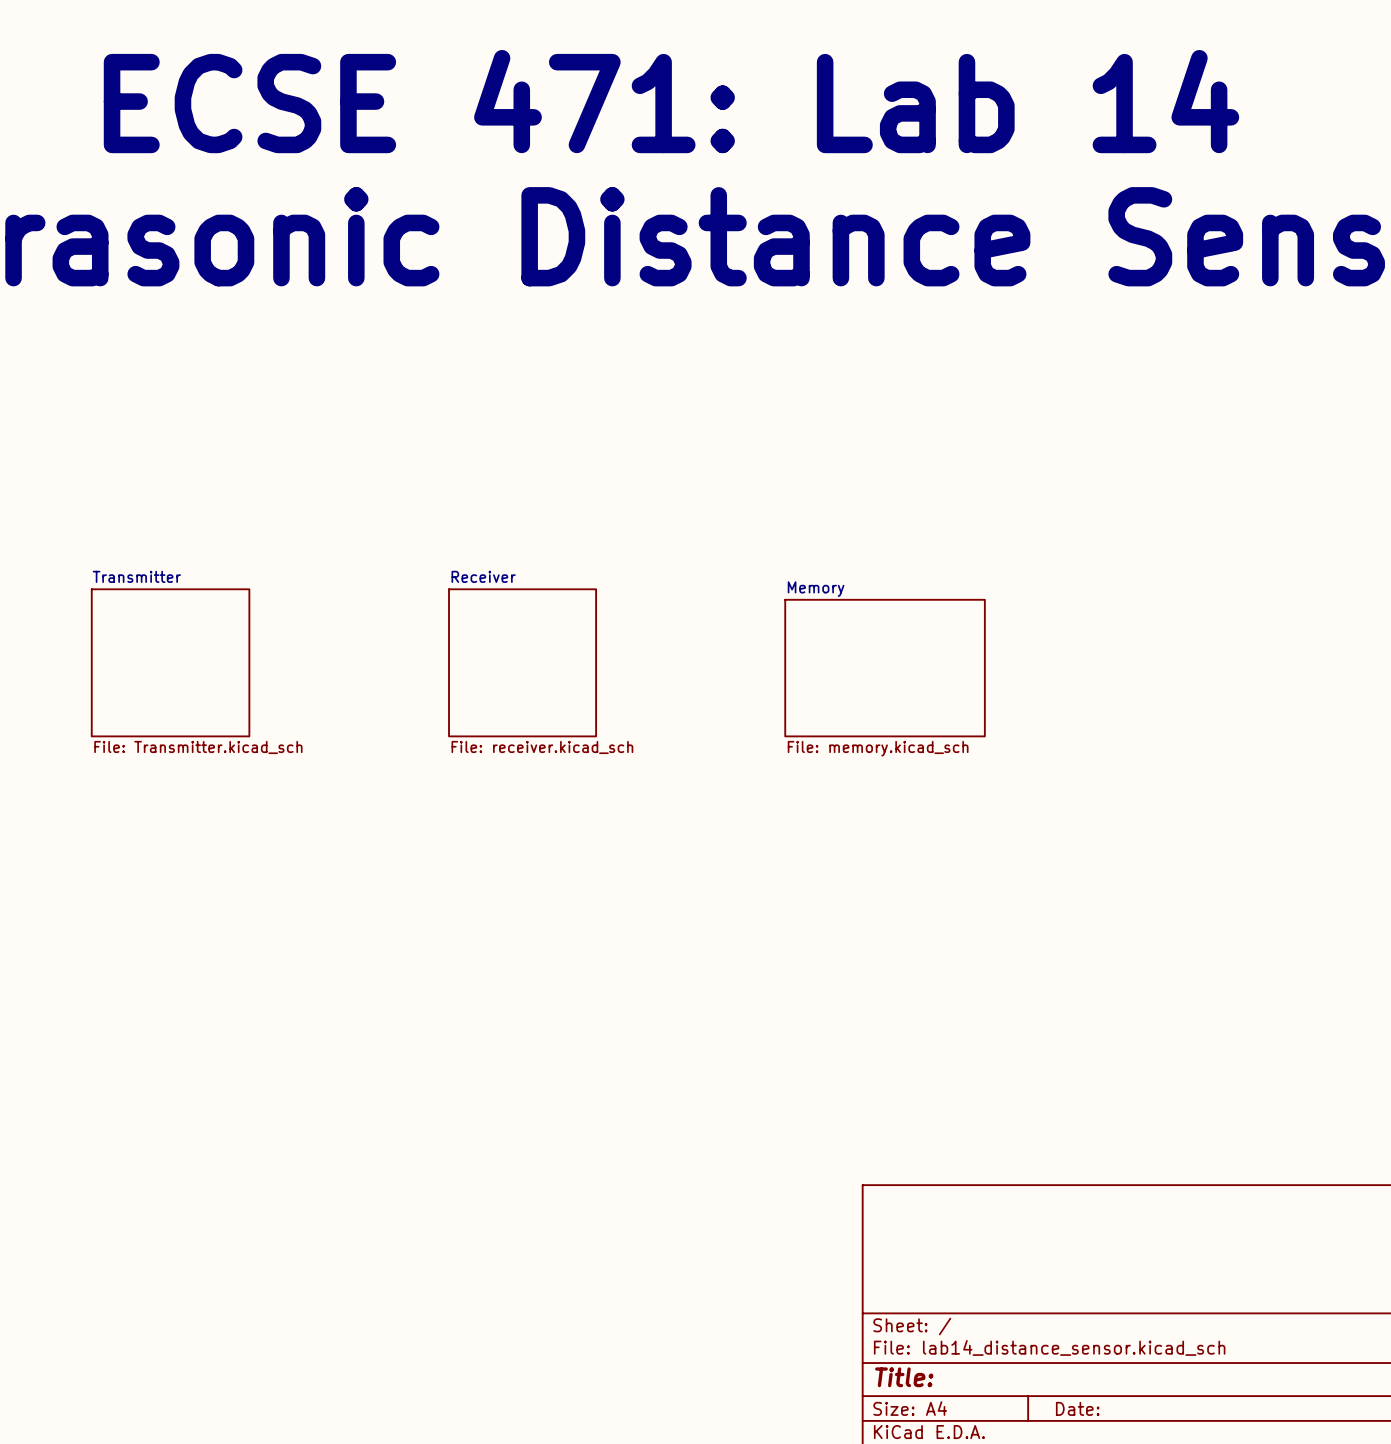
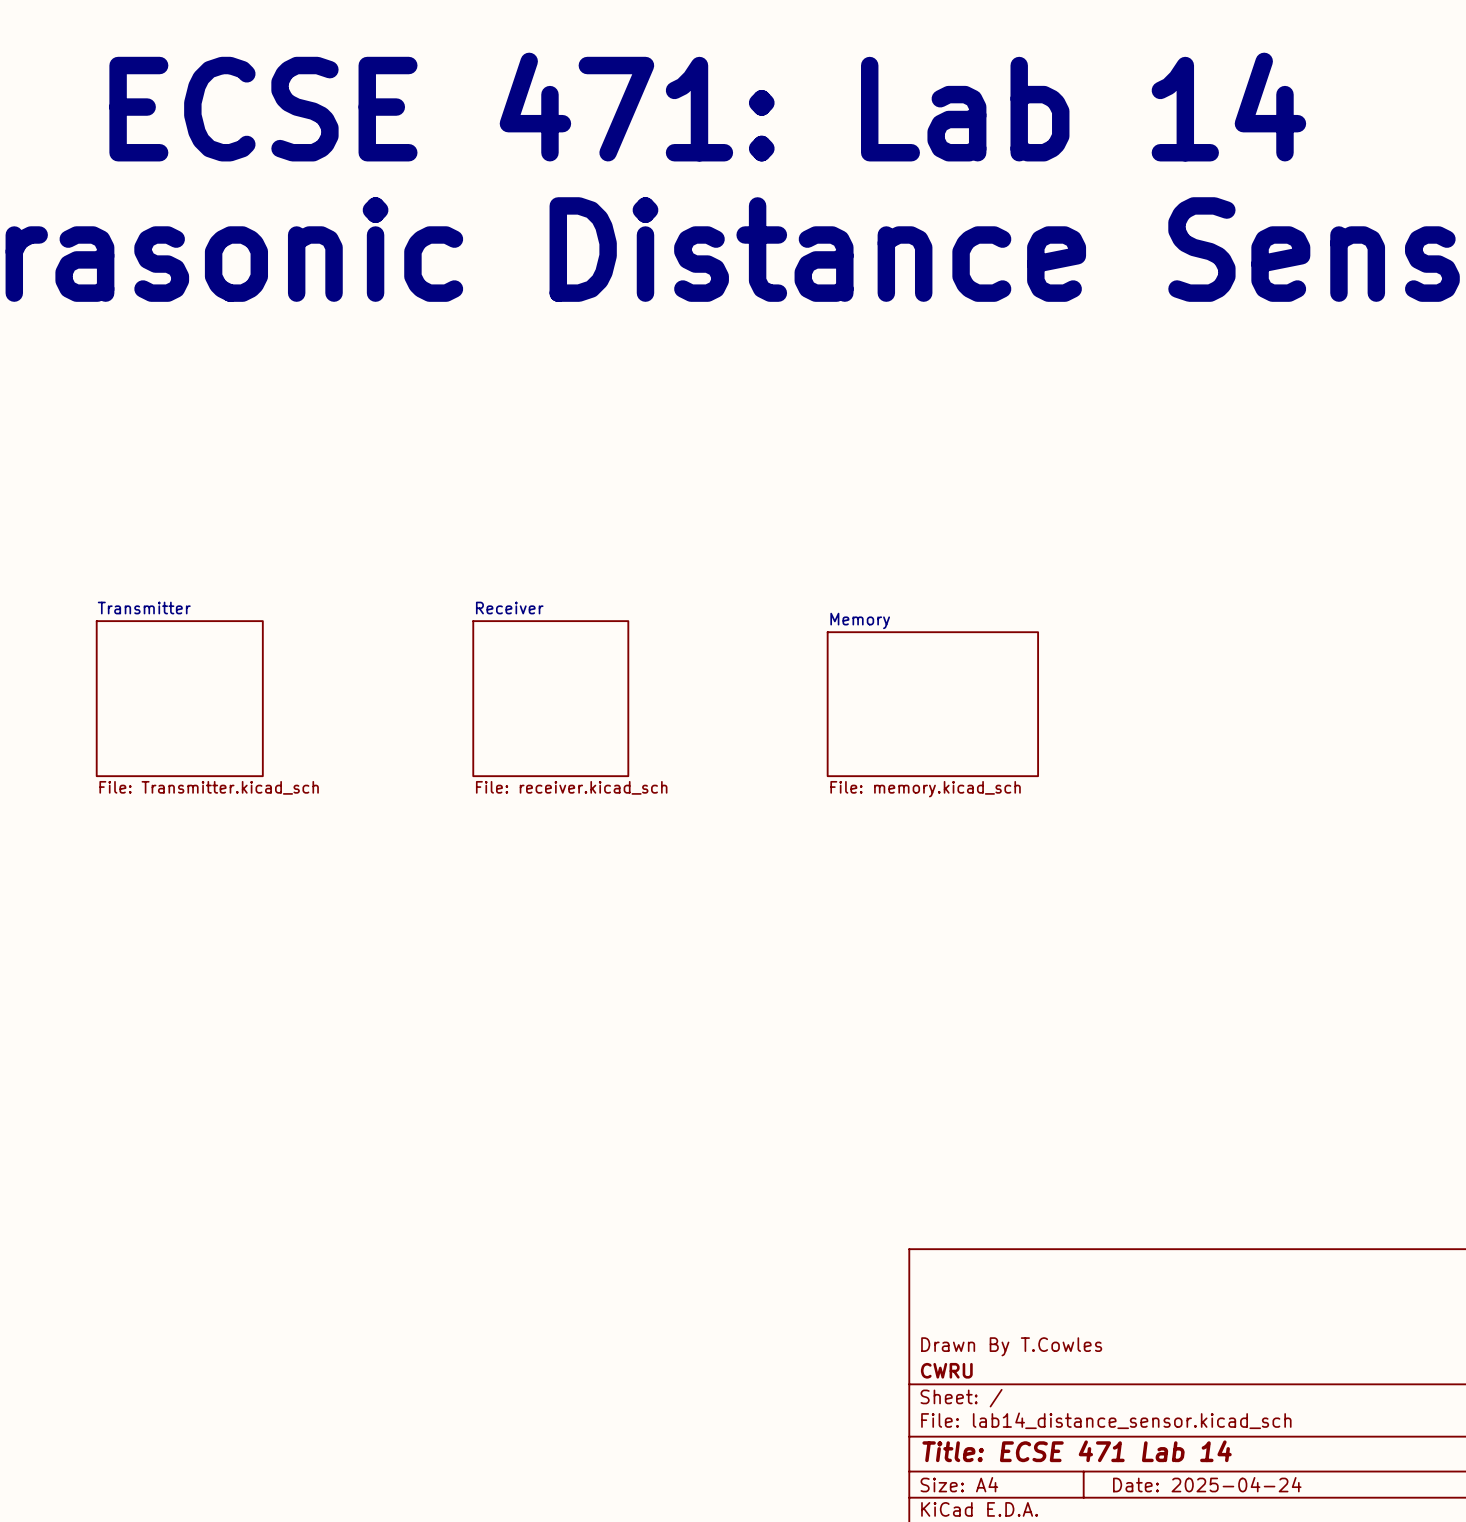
title block: none -> Drawn By T.Cowles (1011, 1346)
title block: none -> CWRU (946, 1370)
title block: Title: (904, 1377) -> Title: ECSE 471 Lab 14 (1077, 1451)
title block: Date: (1077, 1408) -> Date: 2025-04-24 (1207, 1484)

